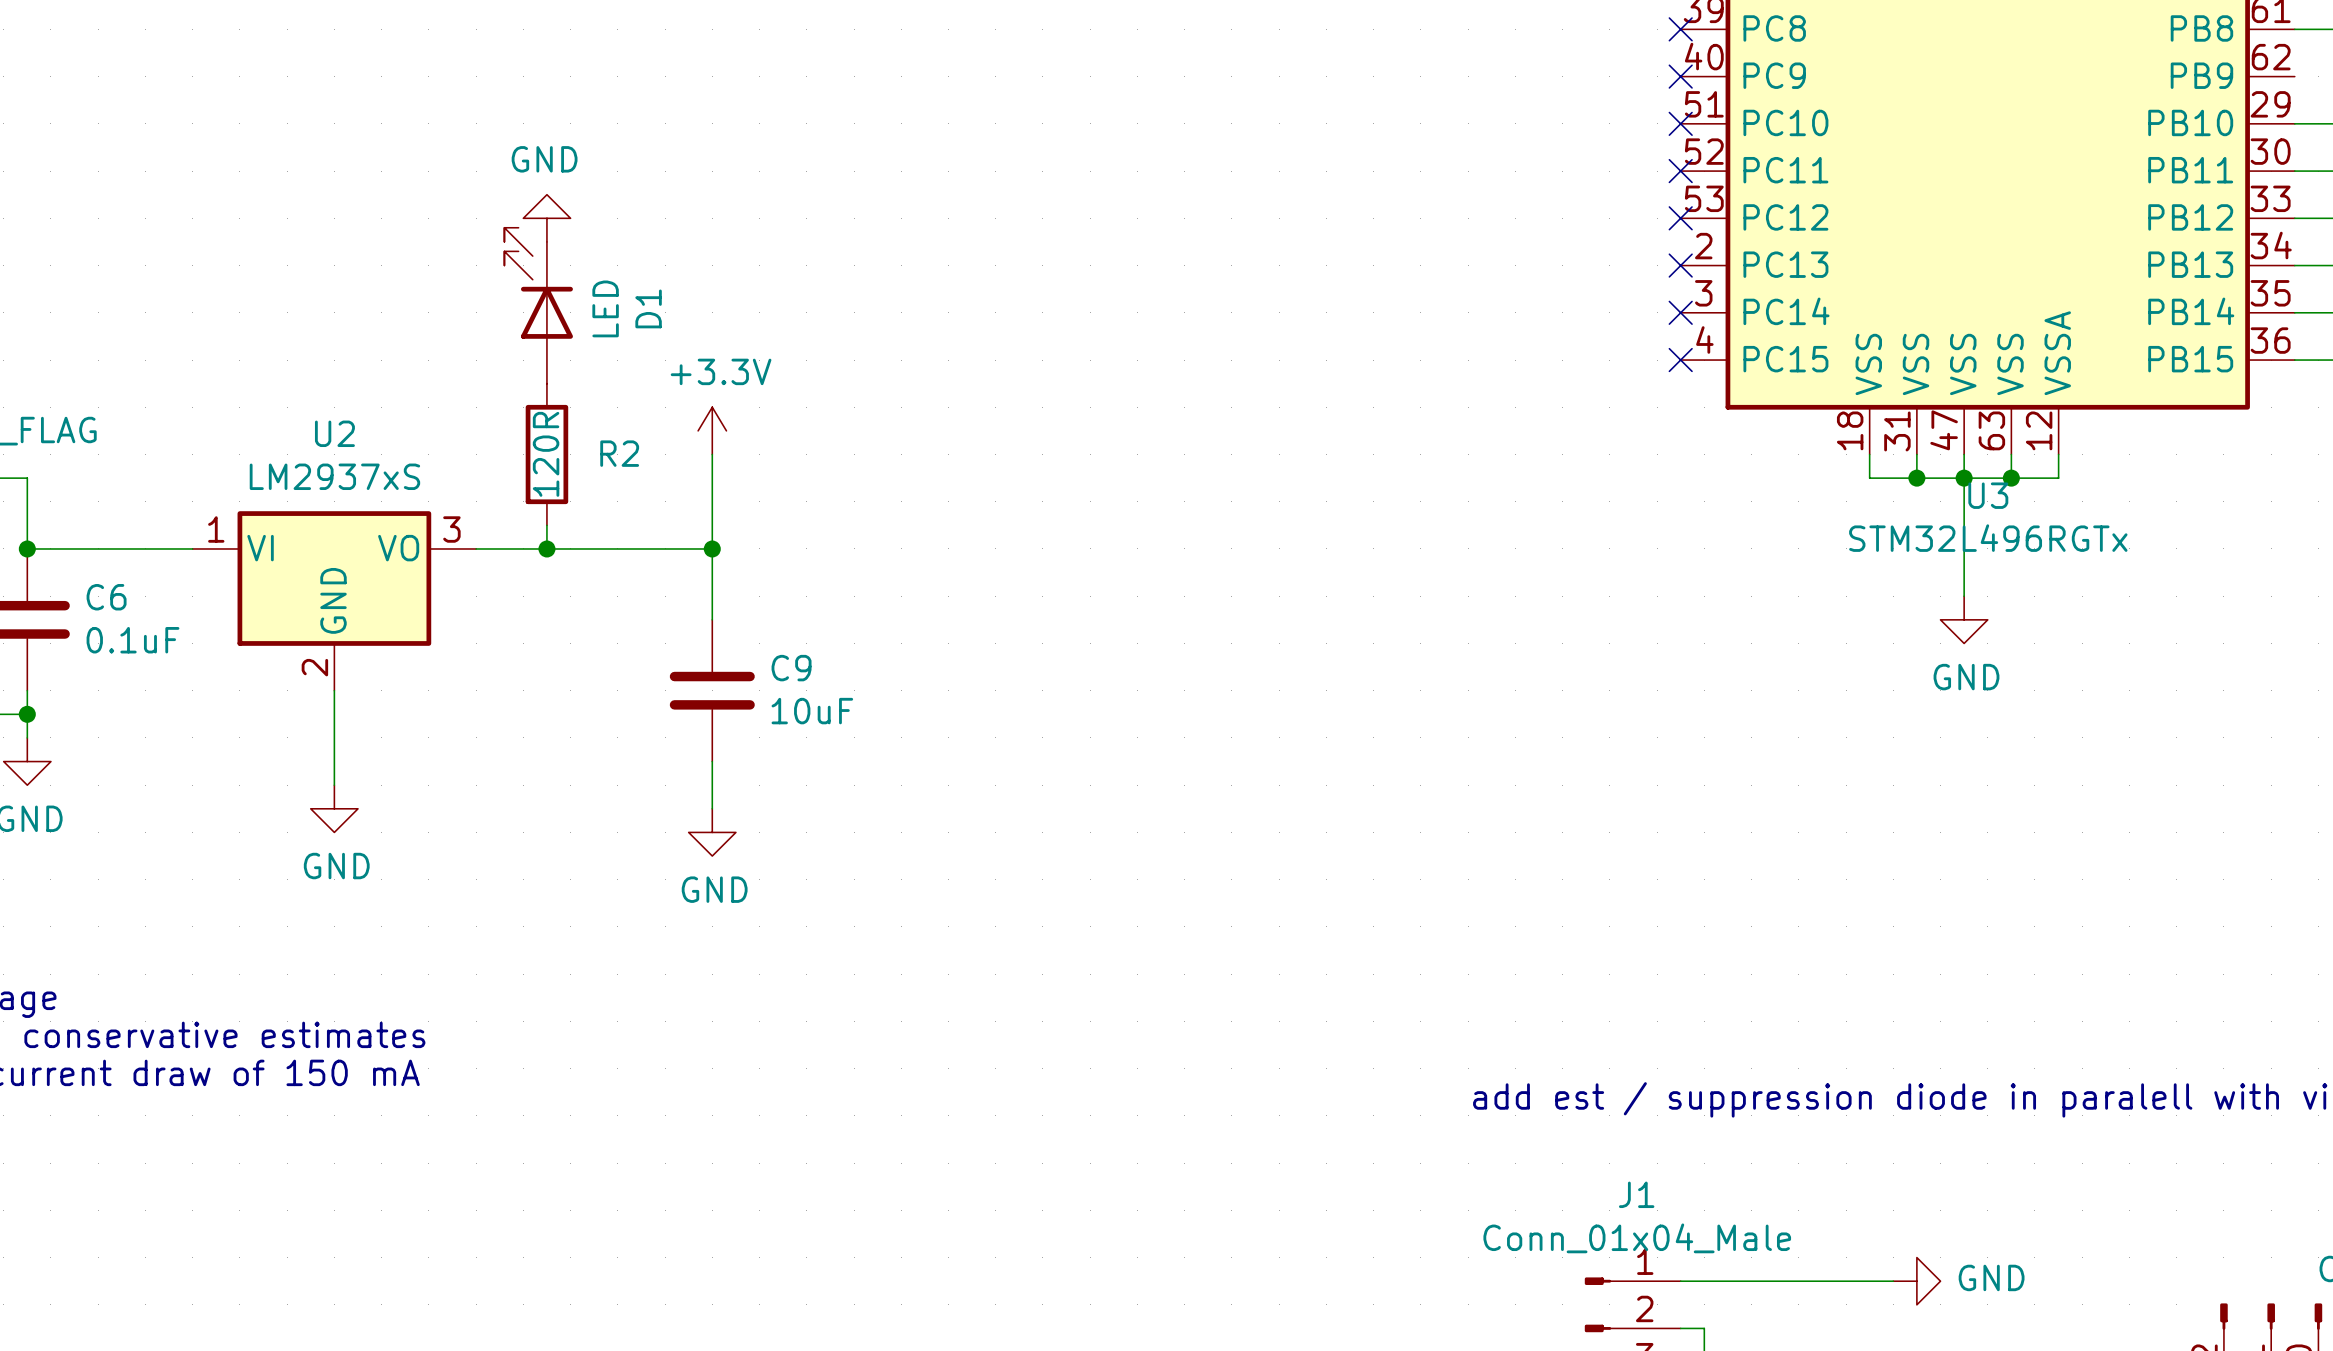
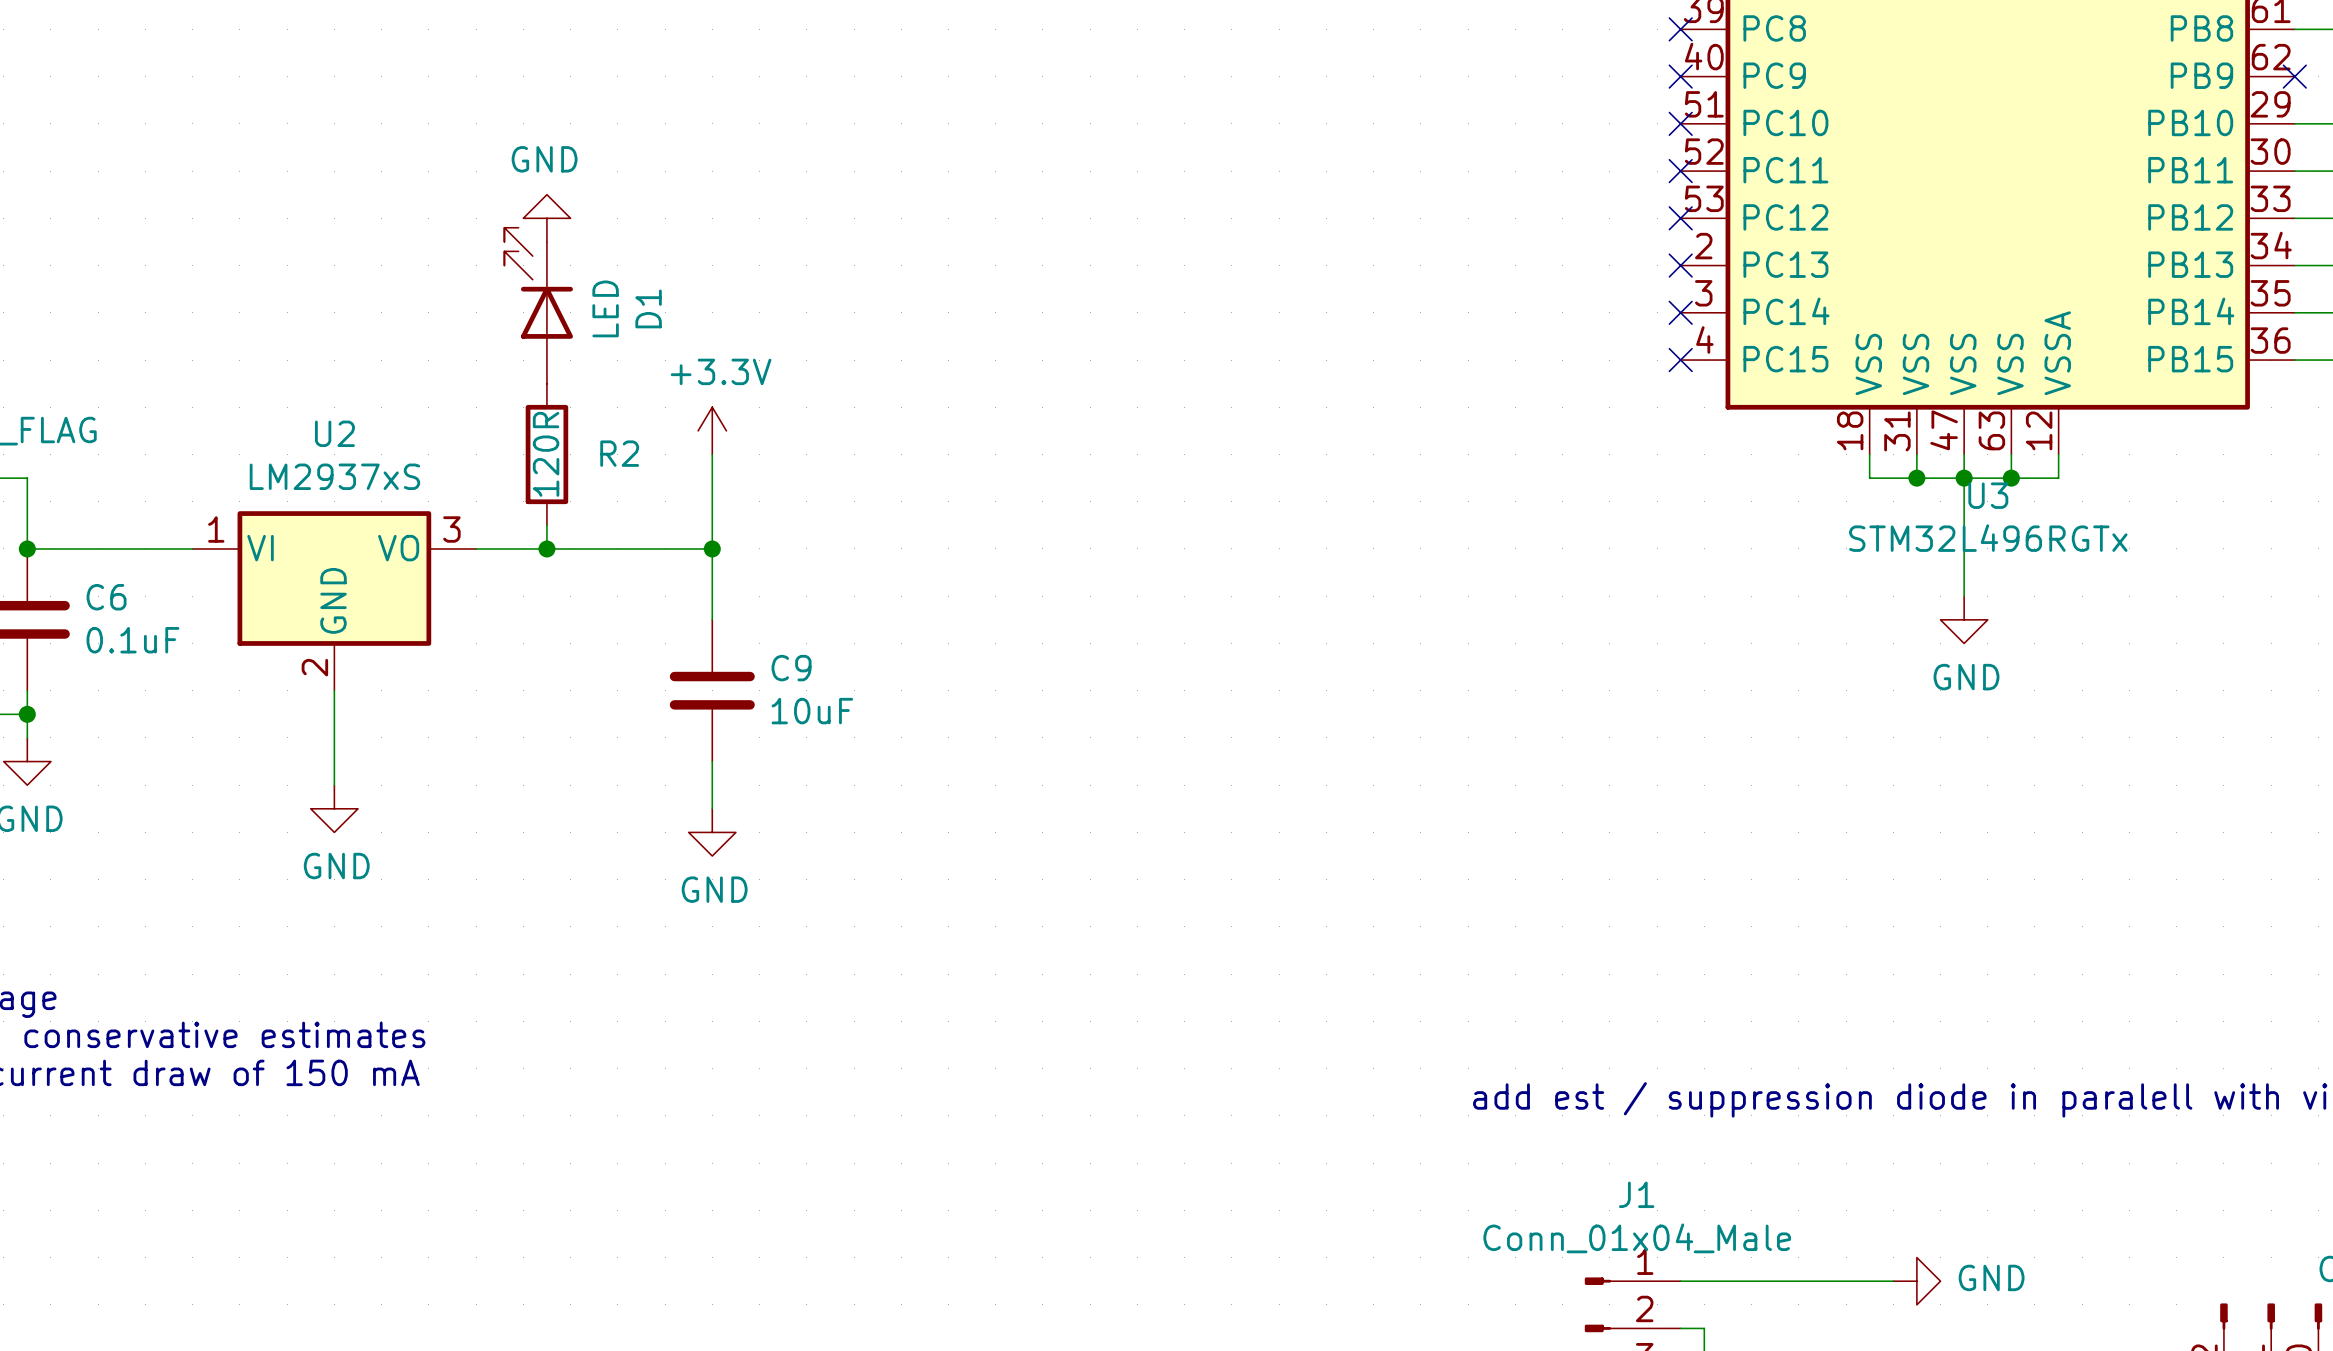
no-connect mark: none -> (2294, 76)

